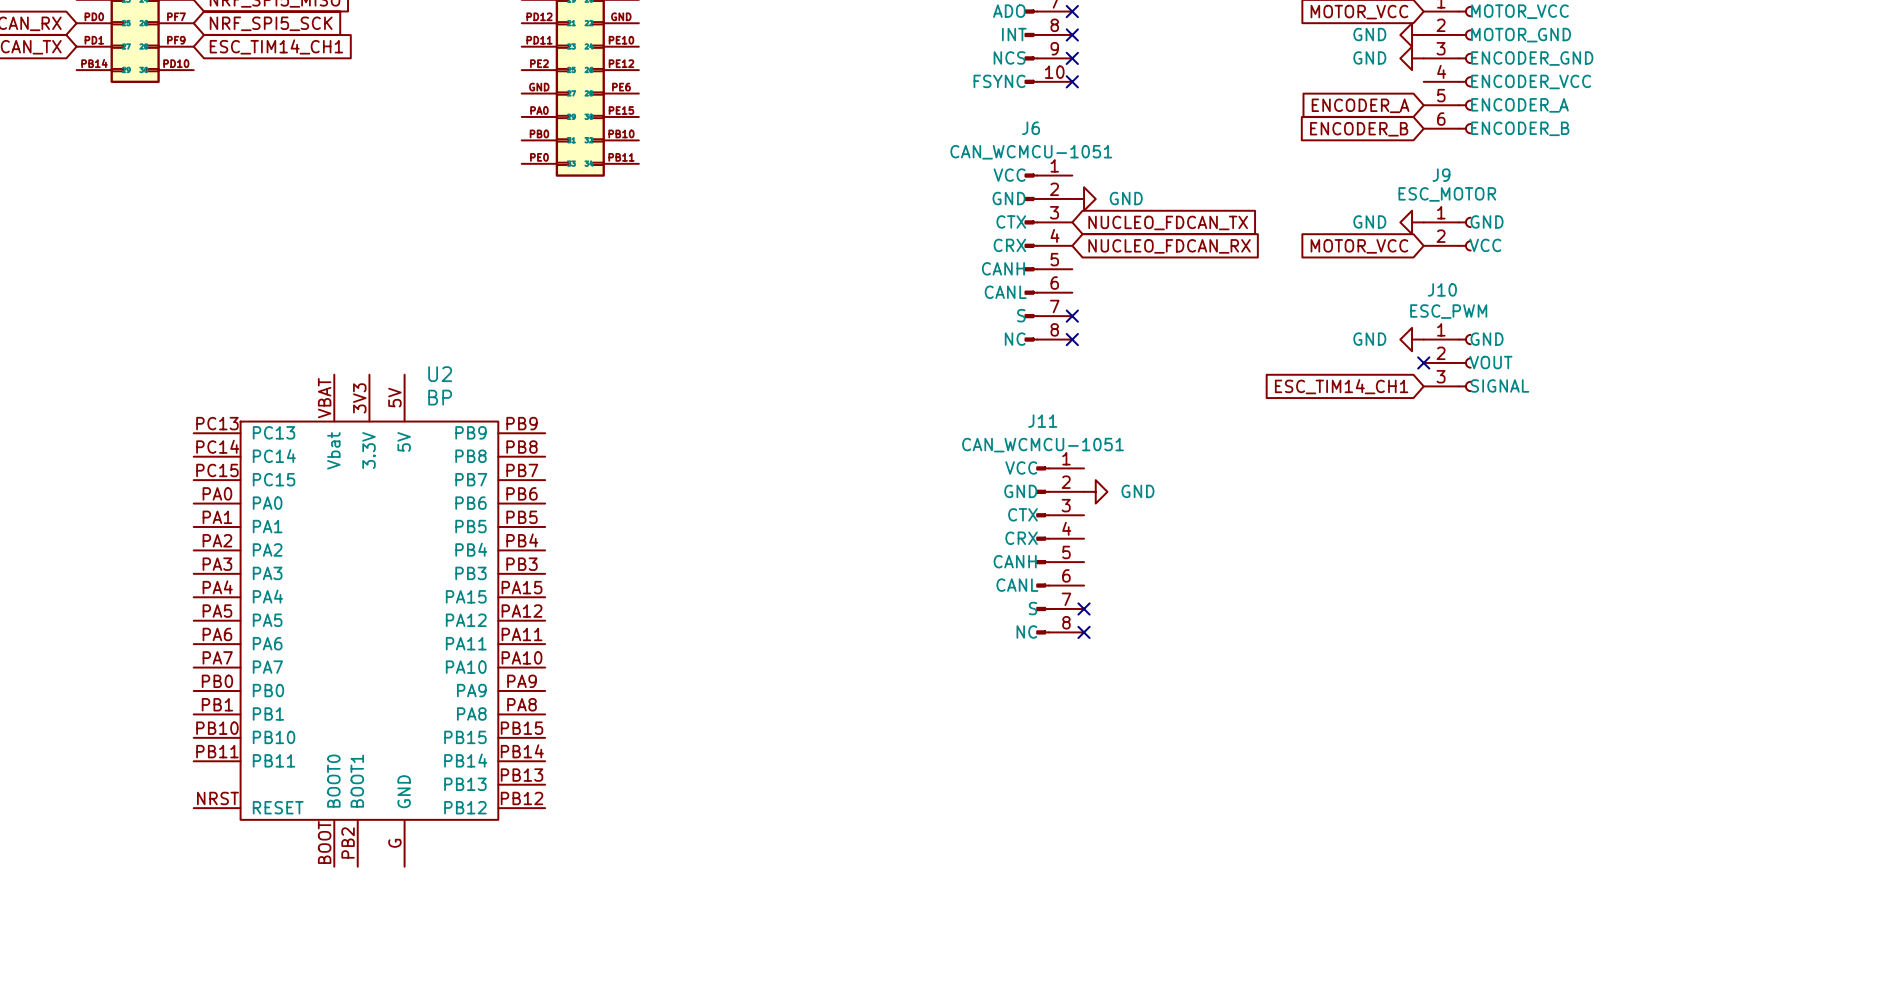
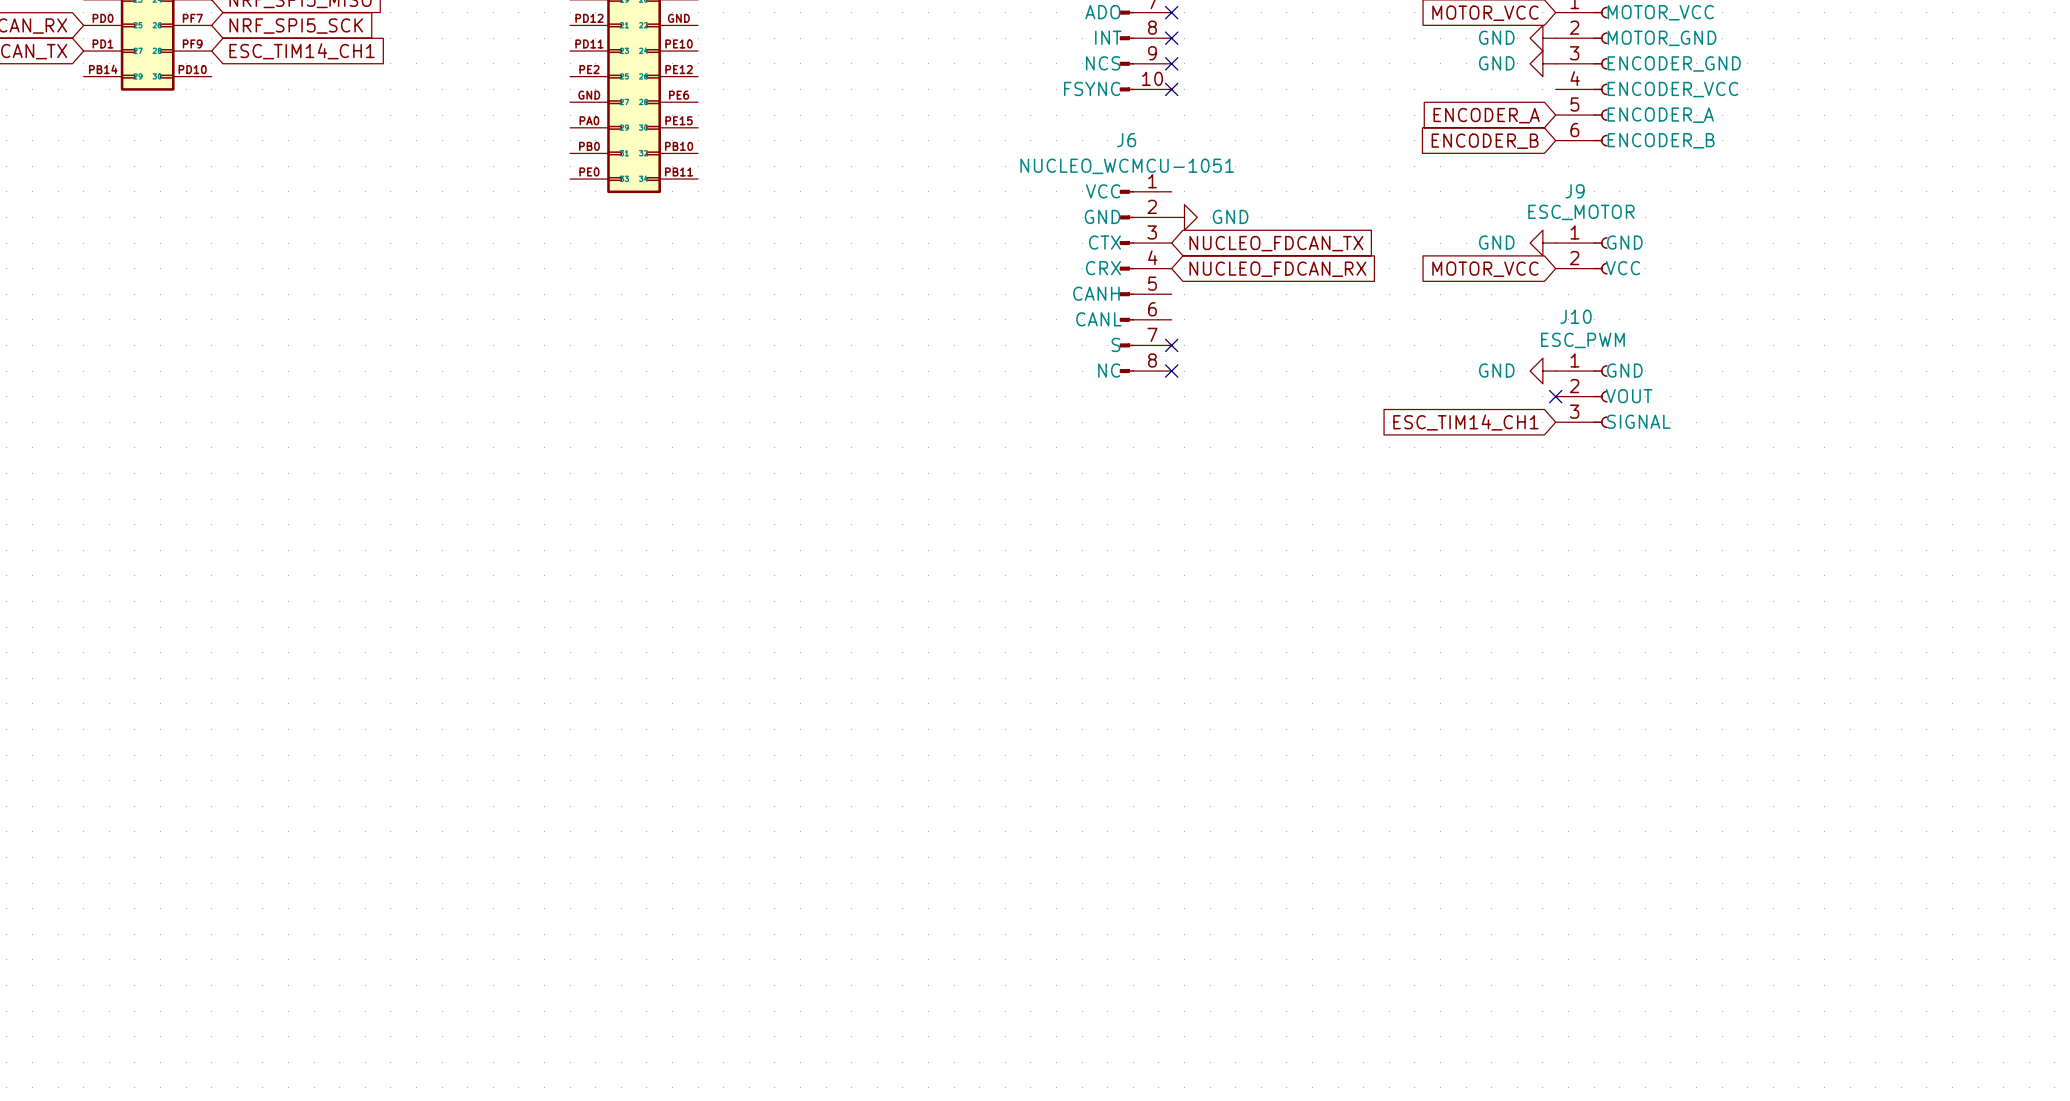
J6 value: CAN_WCMCU-1051 (1031, 152) -> NUCLEO_WCMCU-1051 (1127, 166)
power symbol: GND (1095, 491) -> none
J11: CAN_WCMCU-1051 (1060, 550) -> none
no-connect mark: (1084, 608) -> none
U2: BP (369, 620) -> none
no-connect mark: (1084, 632) -> none

